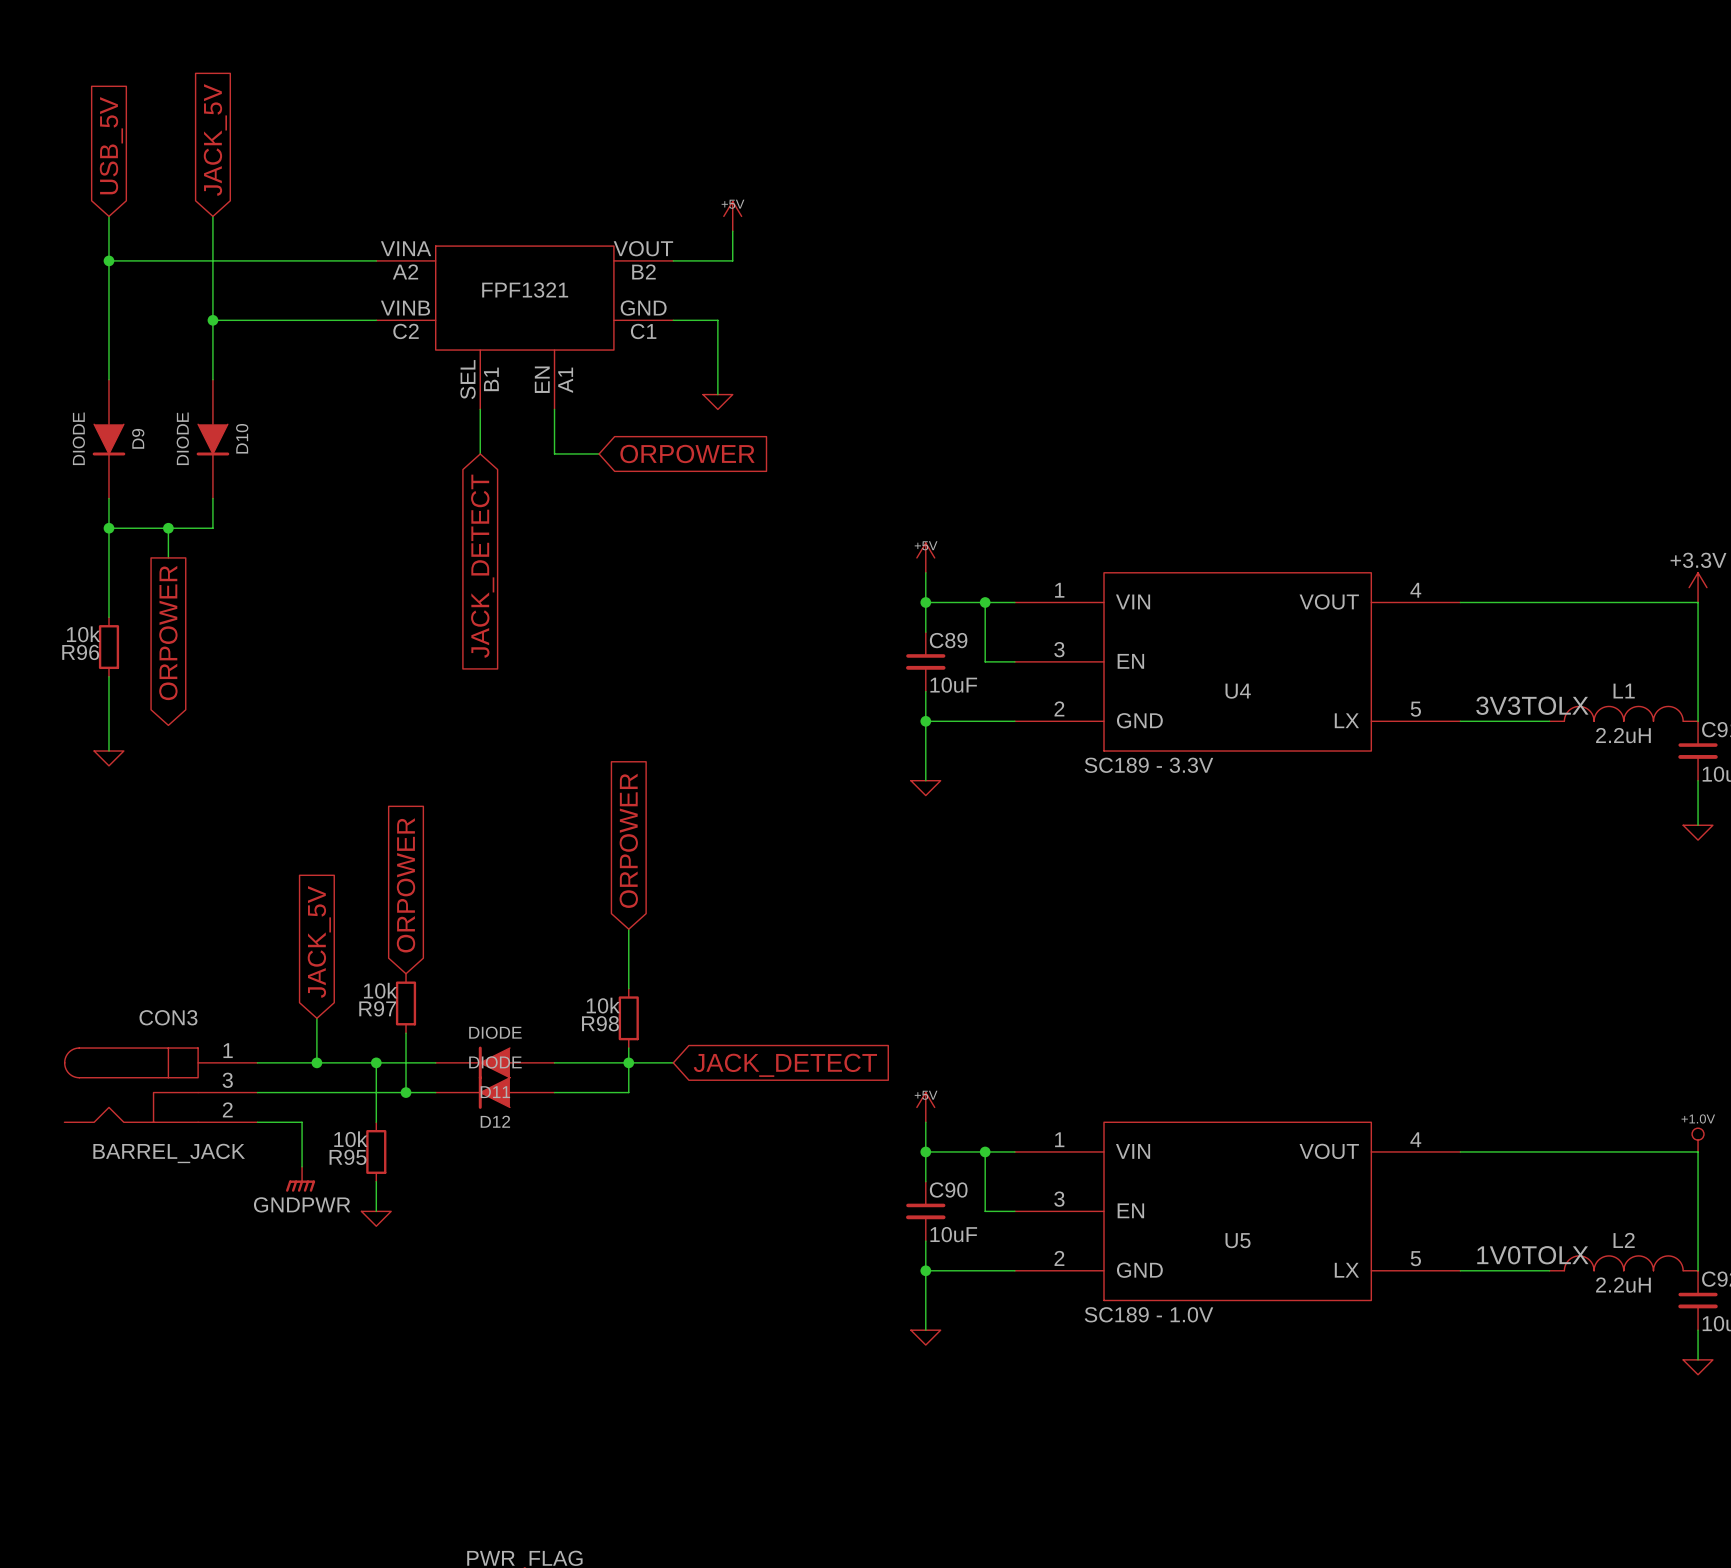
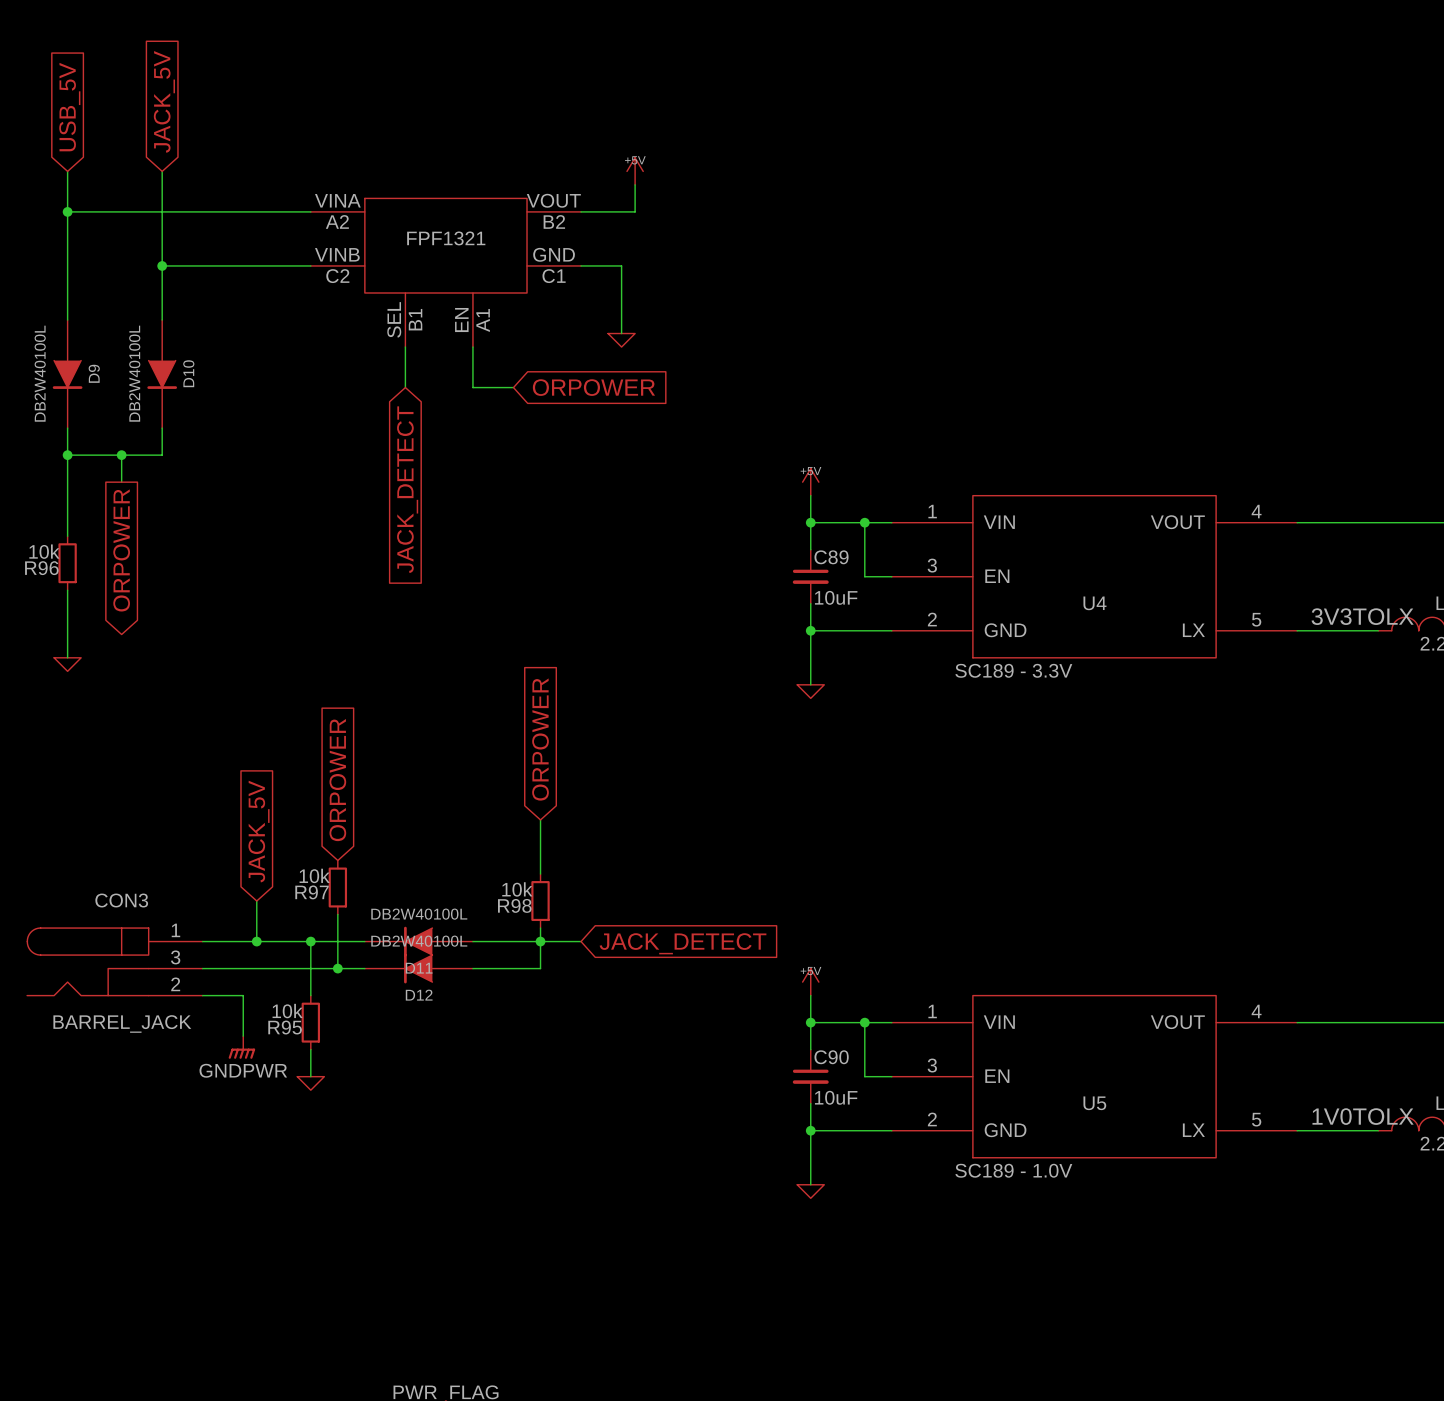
D9 value: DIODE (78, 438) -> DB2W40100L (40, 373)
D10 value: DIODE (182, 438) -> DB2W40100L (134, 373)
D11 value: DIODE (495, 1032) -> DB2W40100L (419, 914)
D12 value: DIODE (495, 1062) -> DB2W40100L (419, 941)

